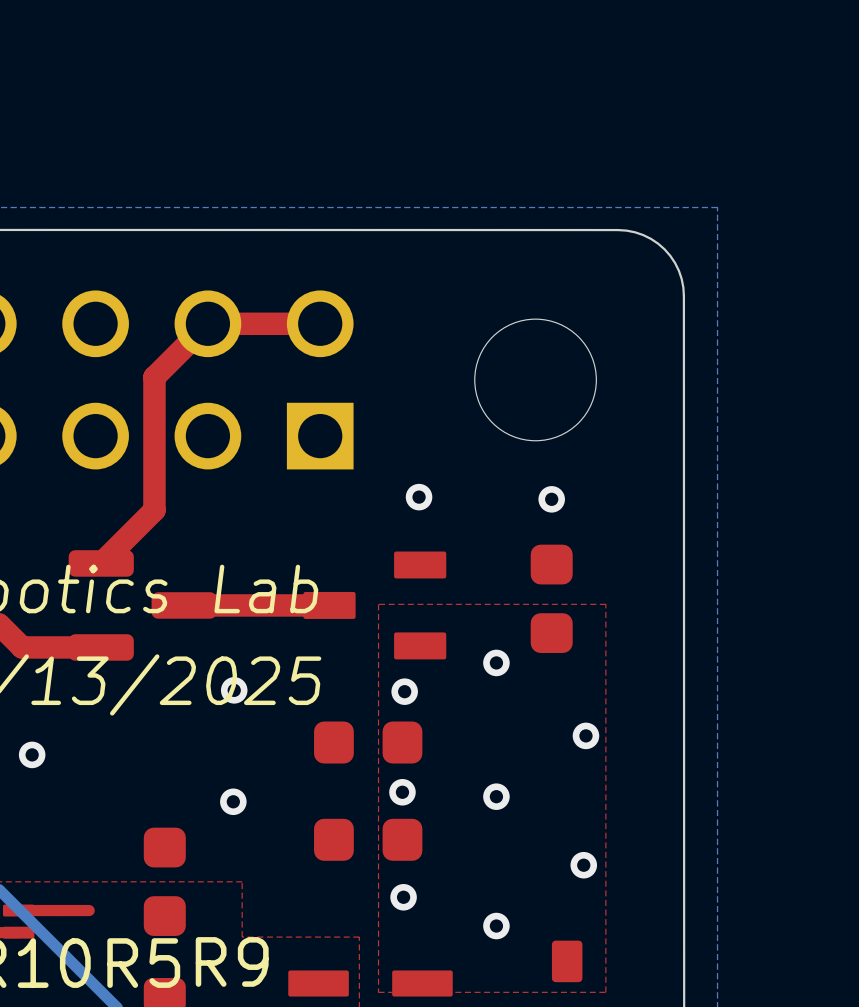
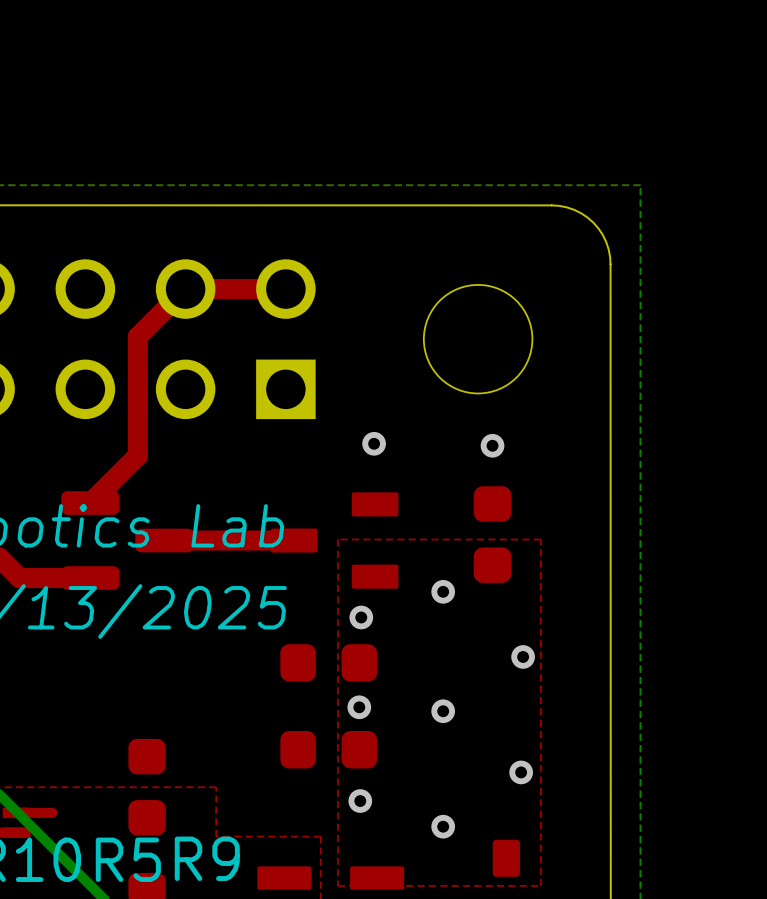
via: (234, 690) -> none
via: (32, 754) -> none
via: (233, 801) -> none
top track: (89, 910) (58, 910) -> none

